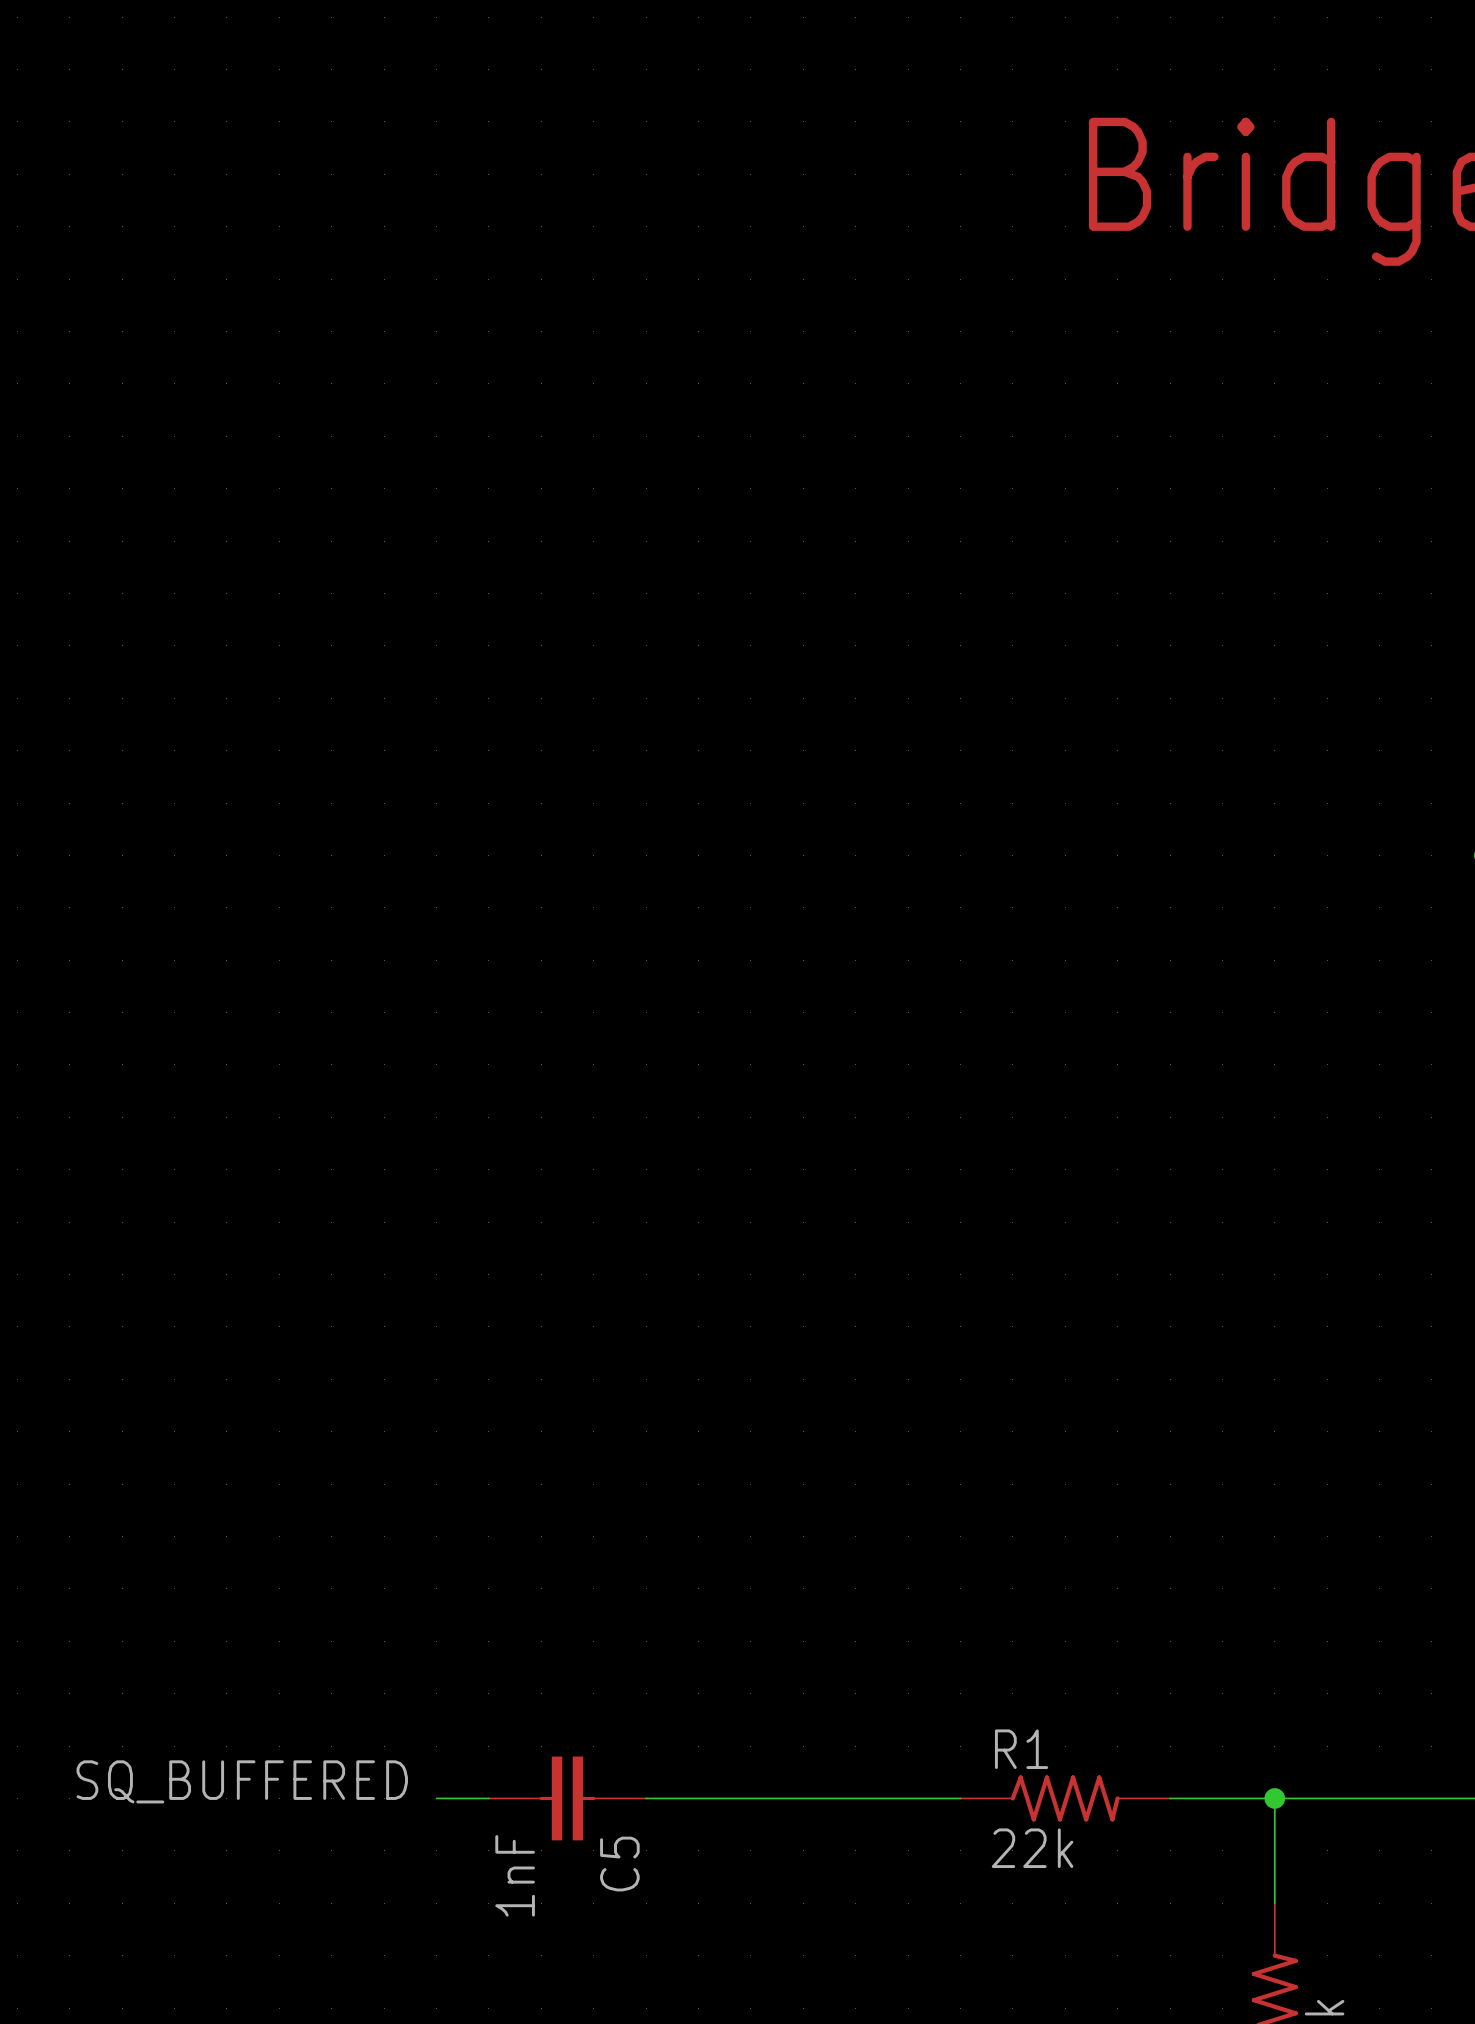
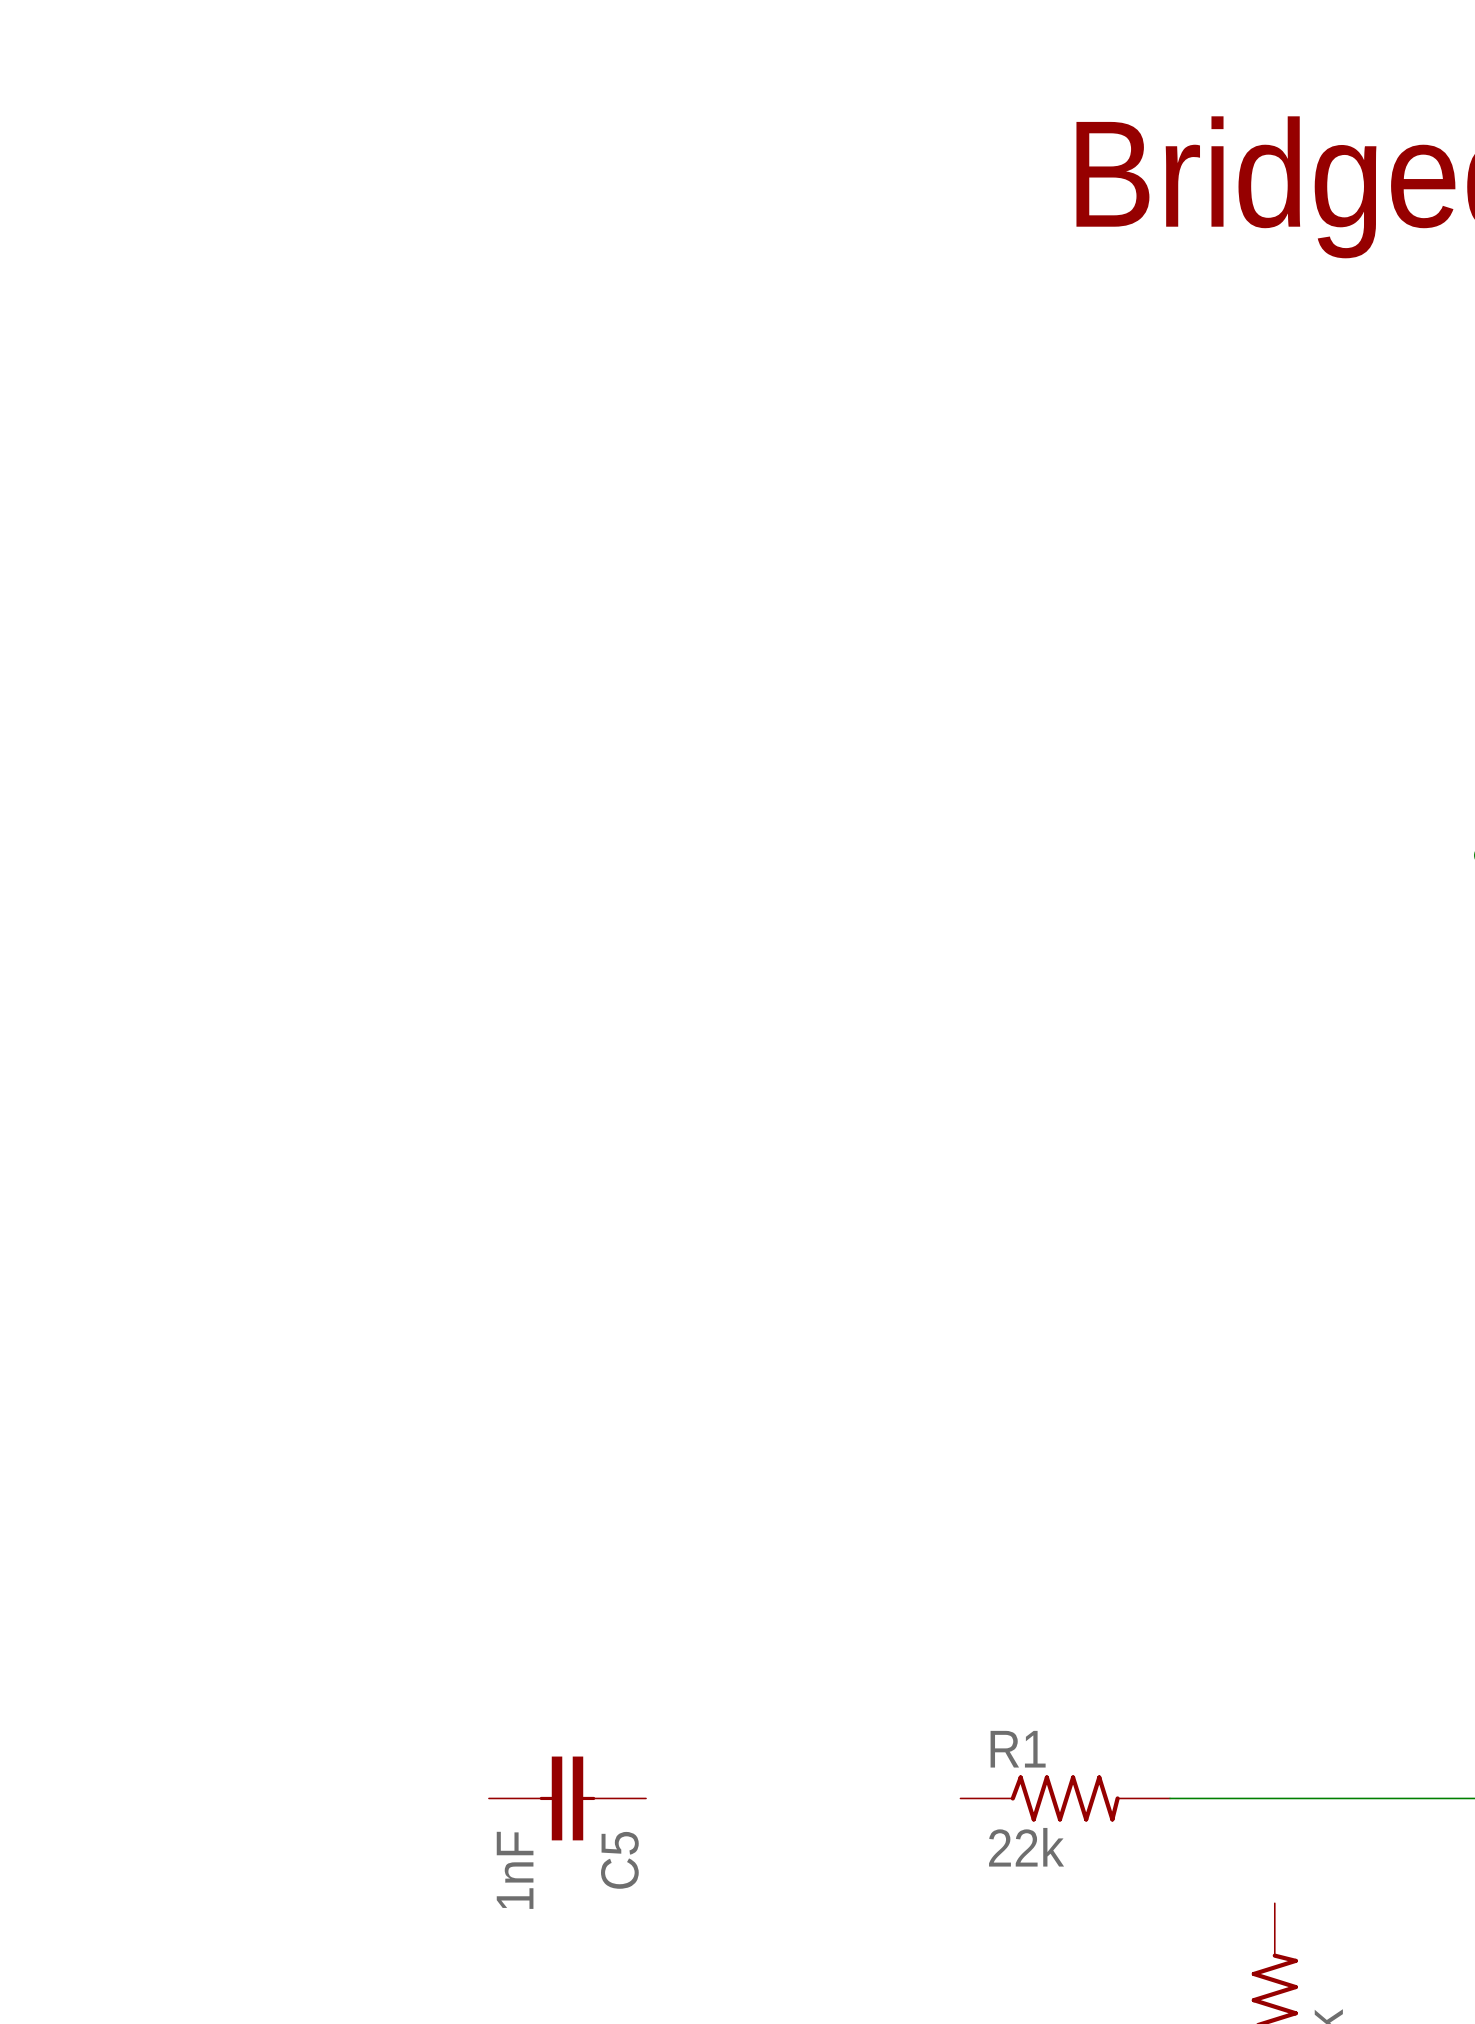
label: SQ_BUFFERED (242, 1781) -> none
wire: (436, 1798) (488, 1798) -> none
wire: (646, 1798) (960, 1798) -> none
wire: (1274, 1798) (1274, 1903) -> none
junction: (1274, 1798) -> none

